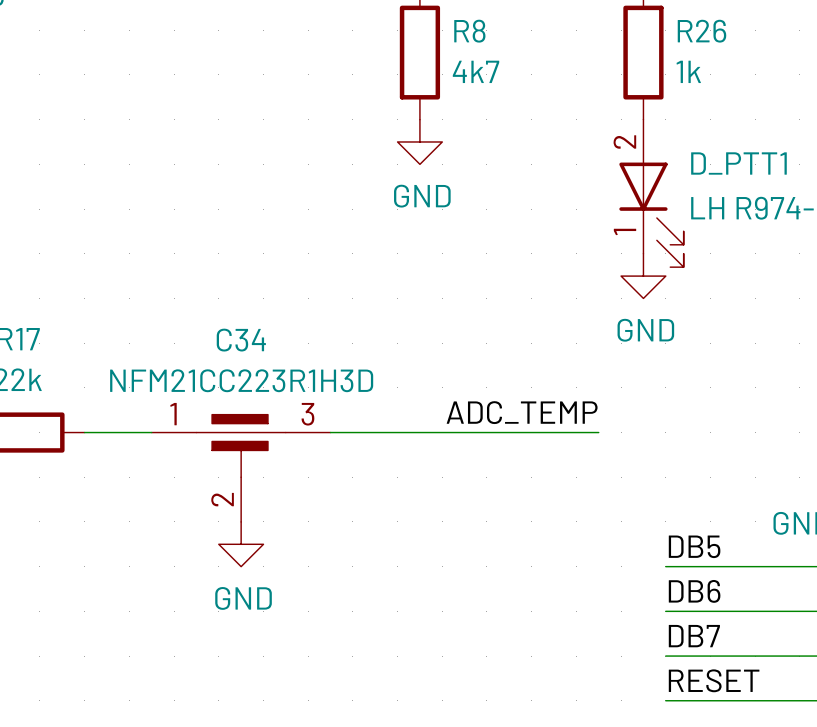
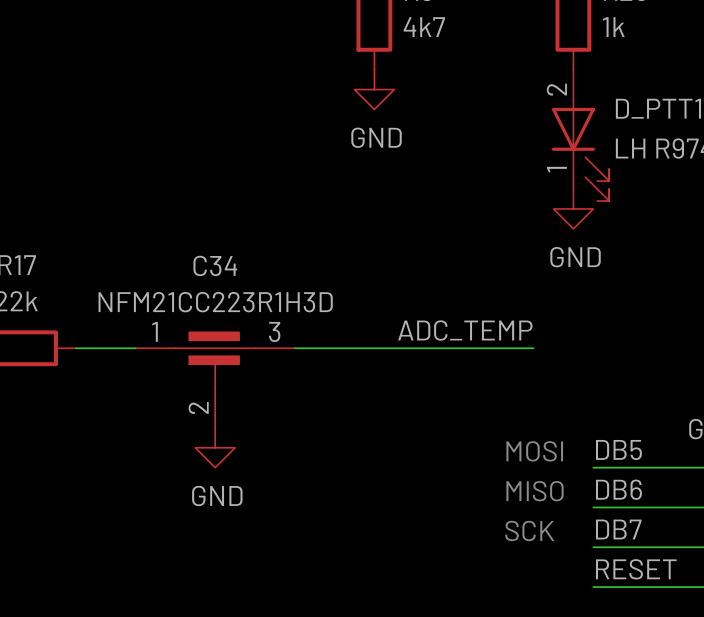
text: none -> MOSI (534, 451)
text: none -> MISO (535, 491)
text: none -> SCK (529, 530)

